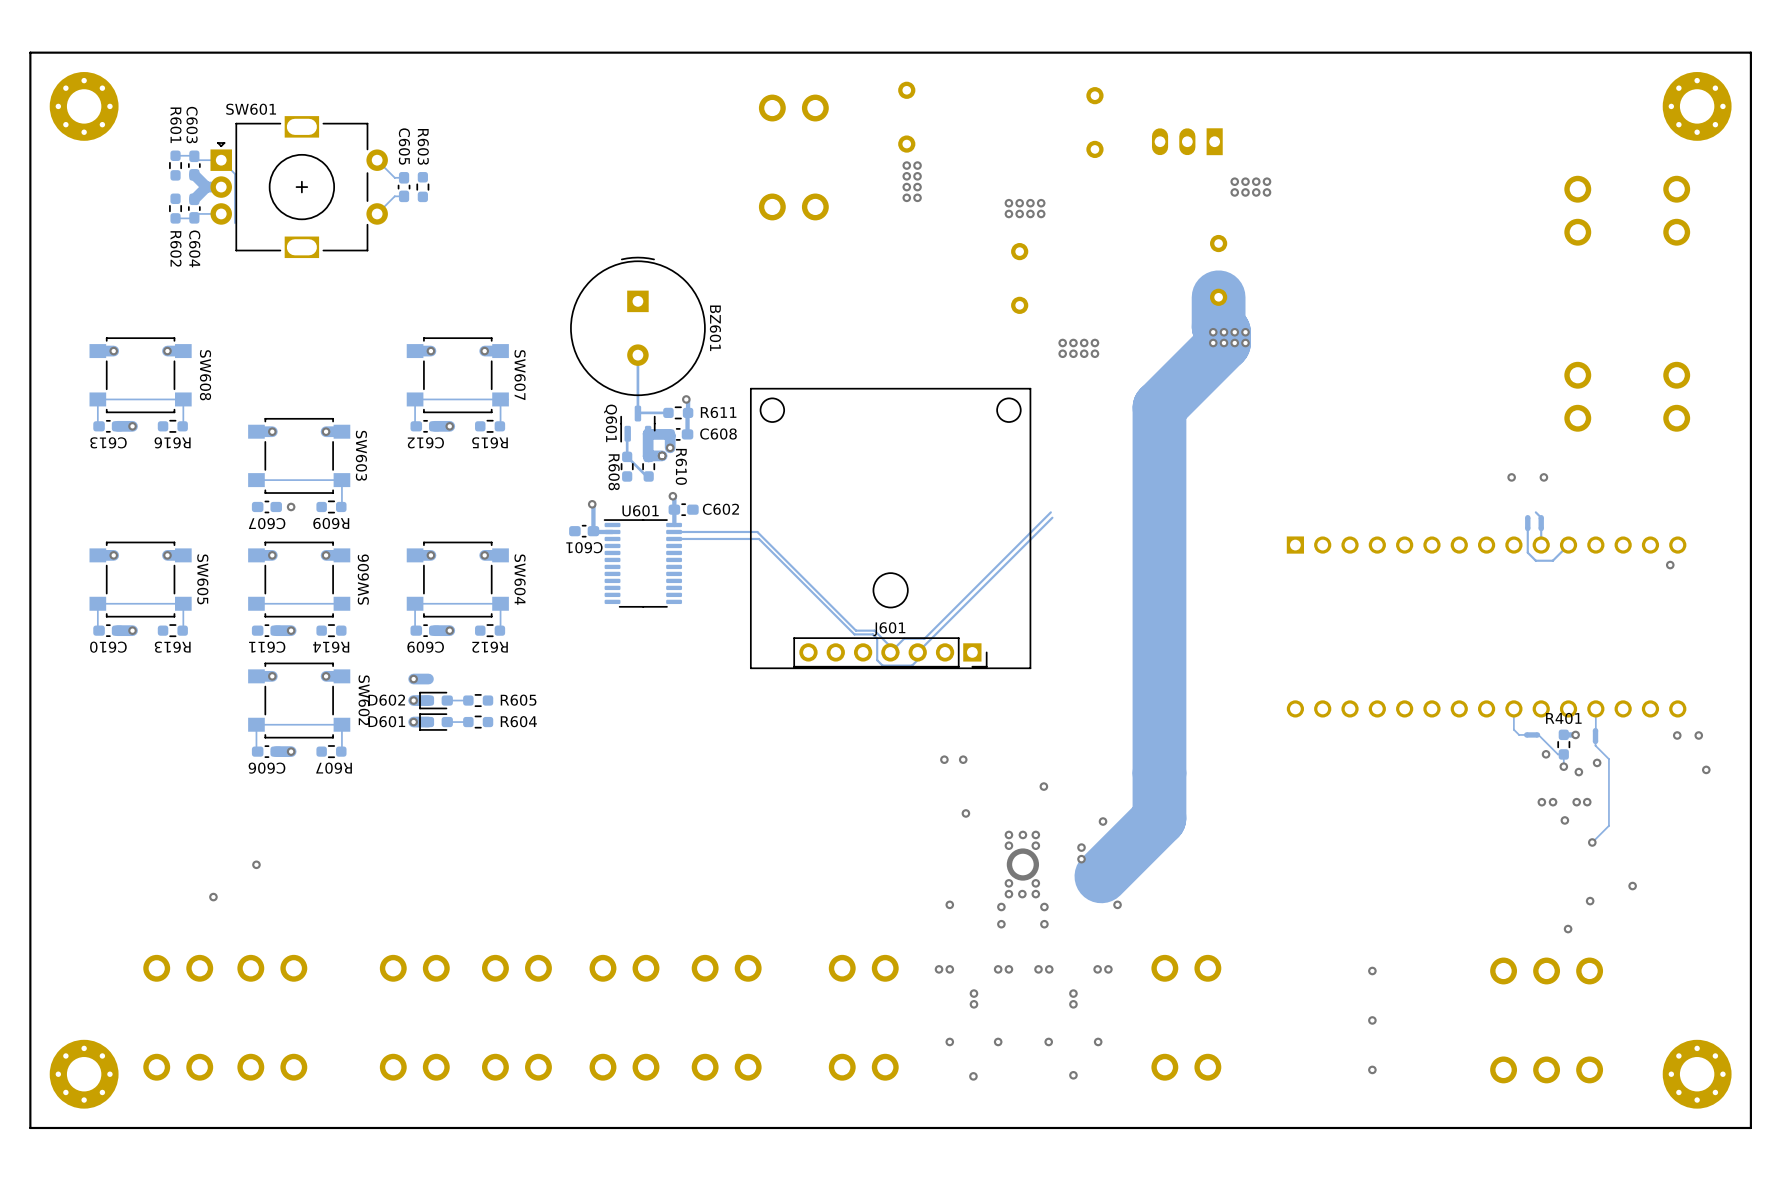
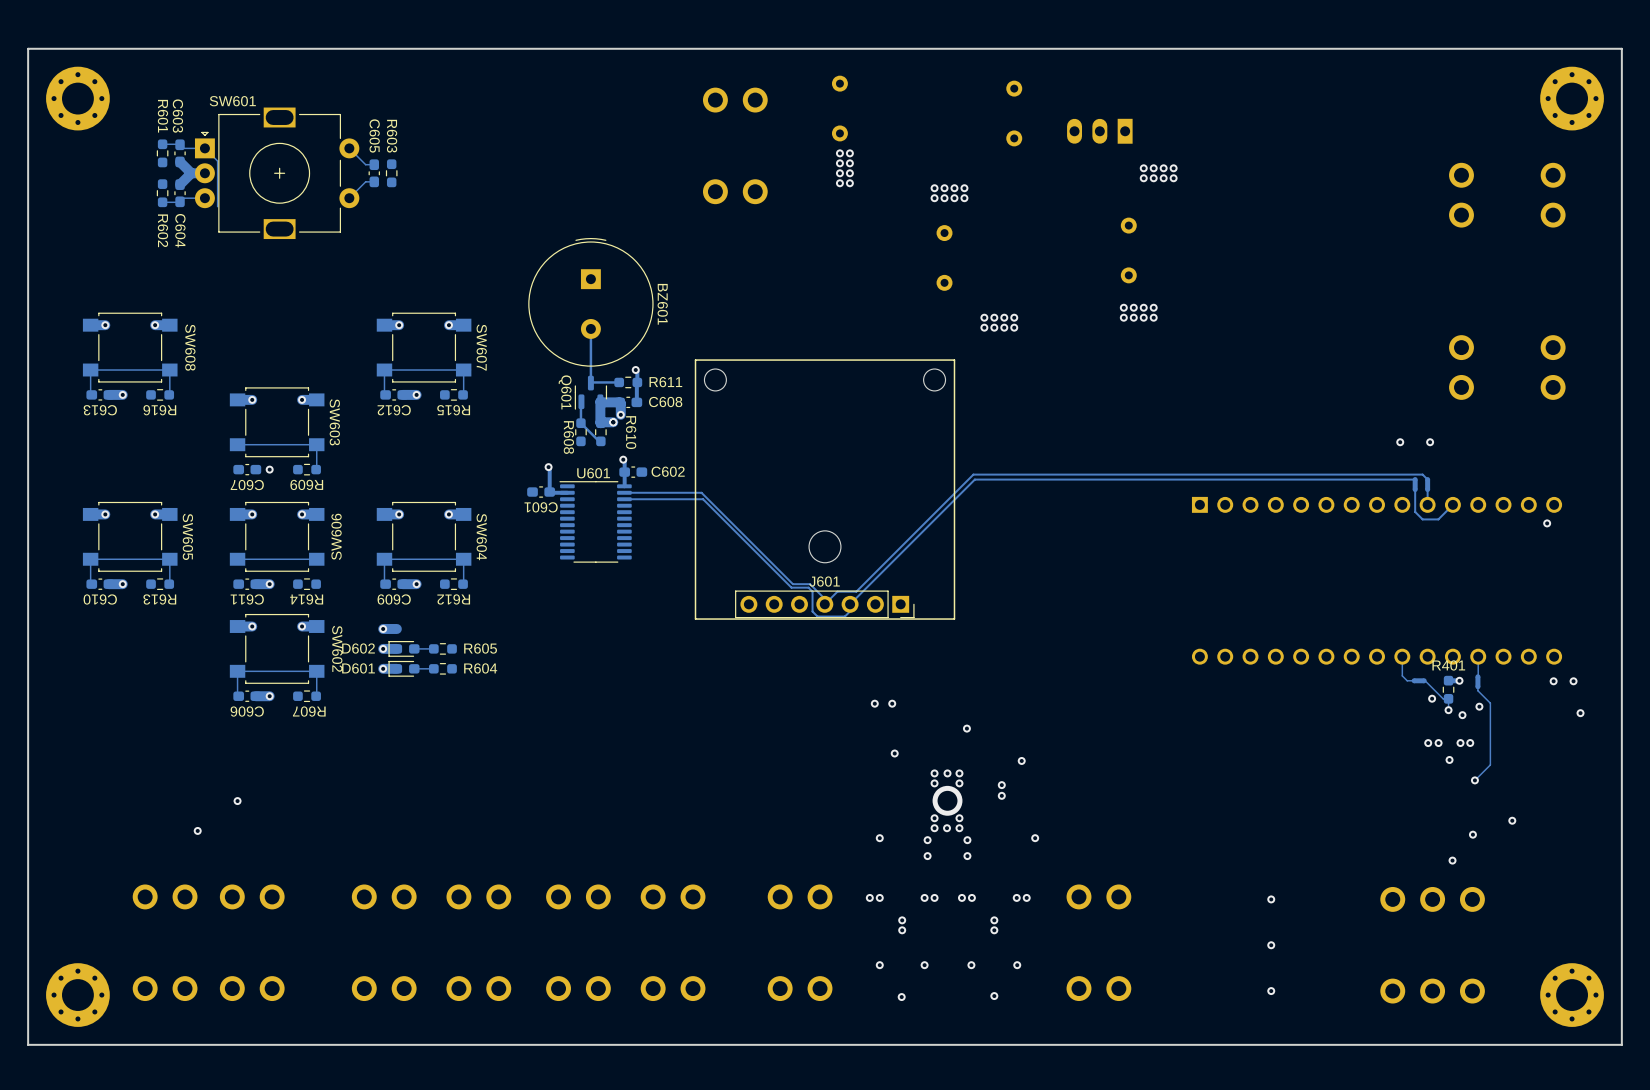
track: (1218, 297) (1218, 326) (1223, 332) (1223, 342) (1159, 407) (1159, 818) (1101, 876) -> none
track: none -> (1422, 474) (973, 474)
track: none -> (1415, 479) (974, 479)

